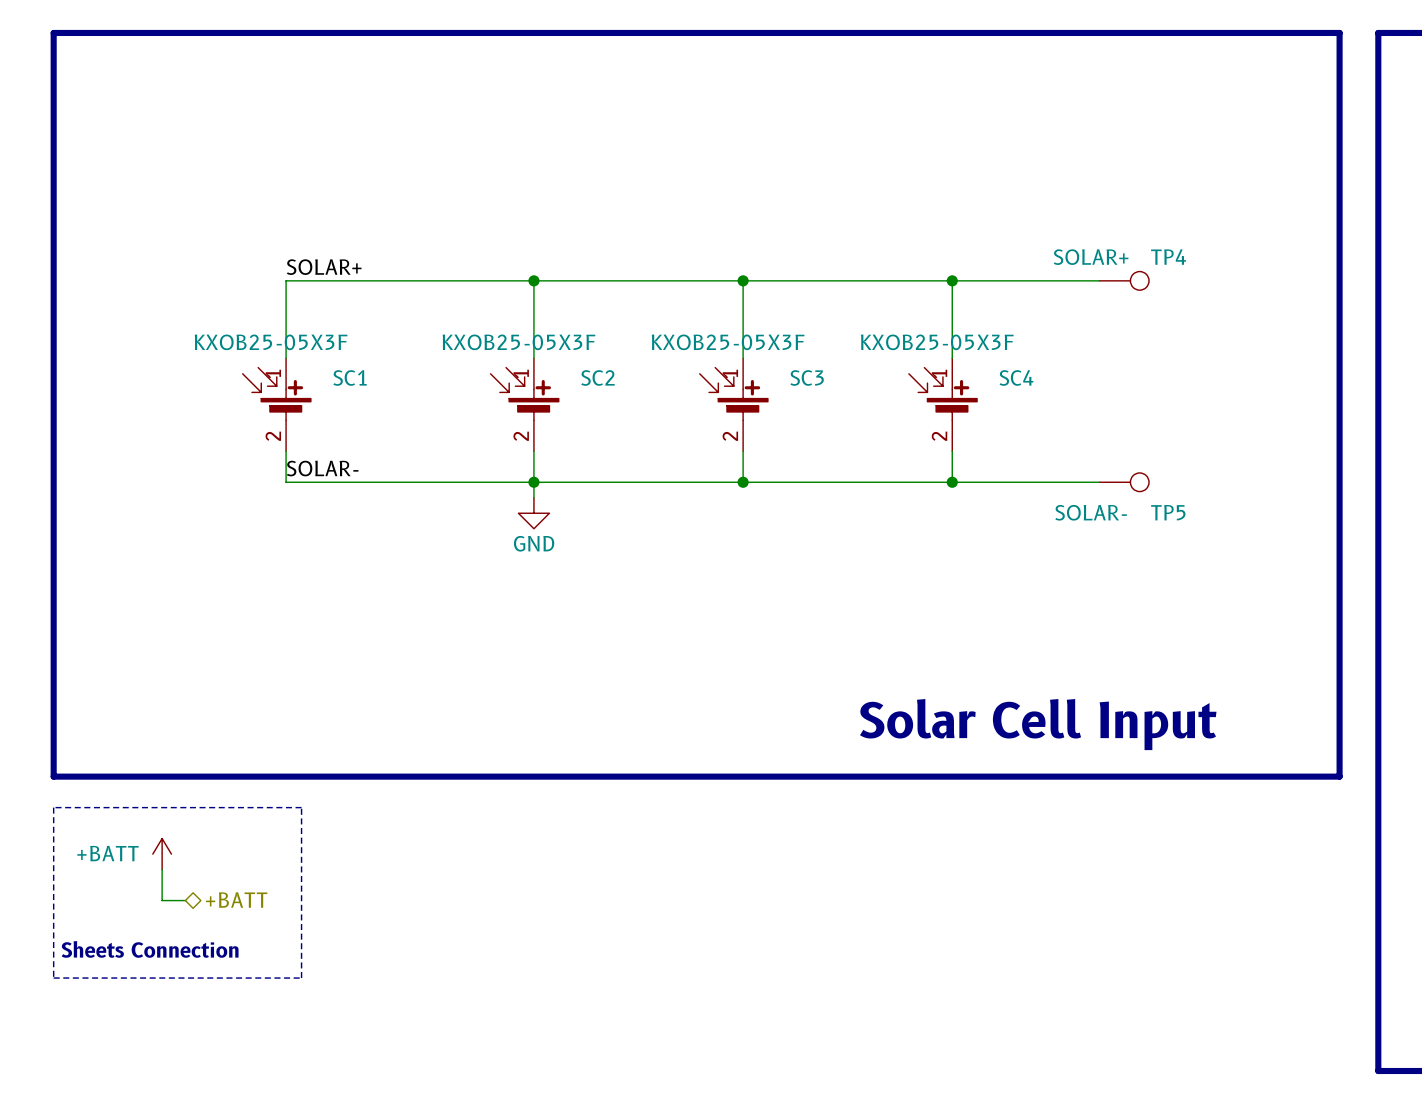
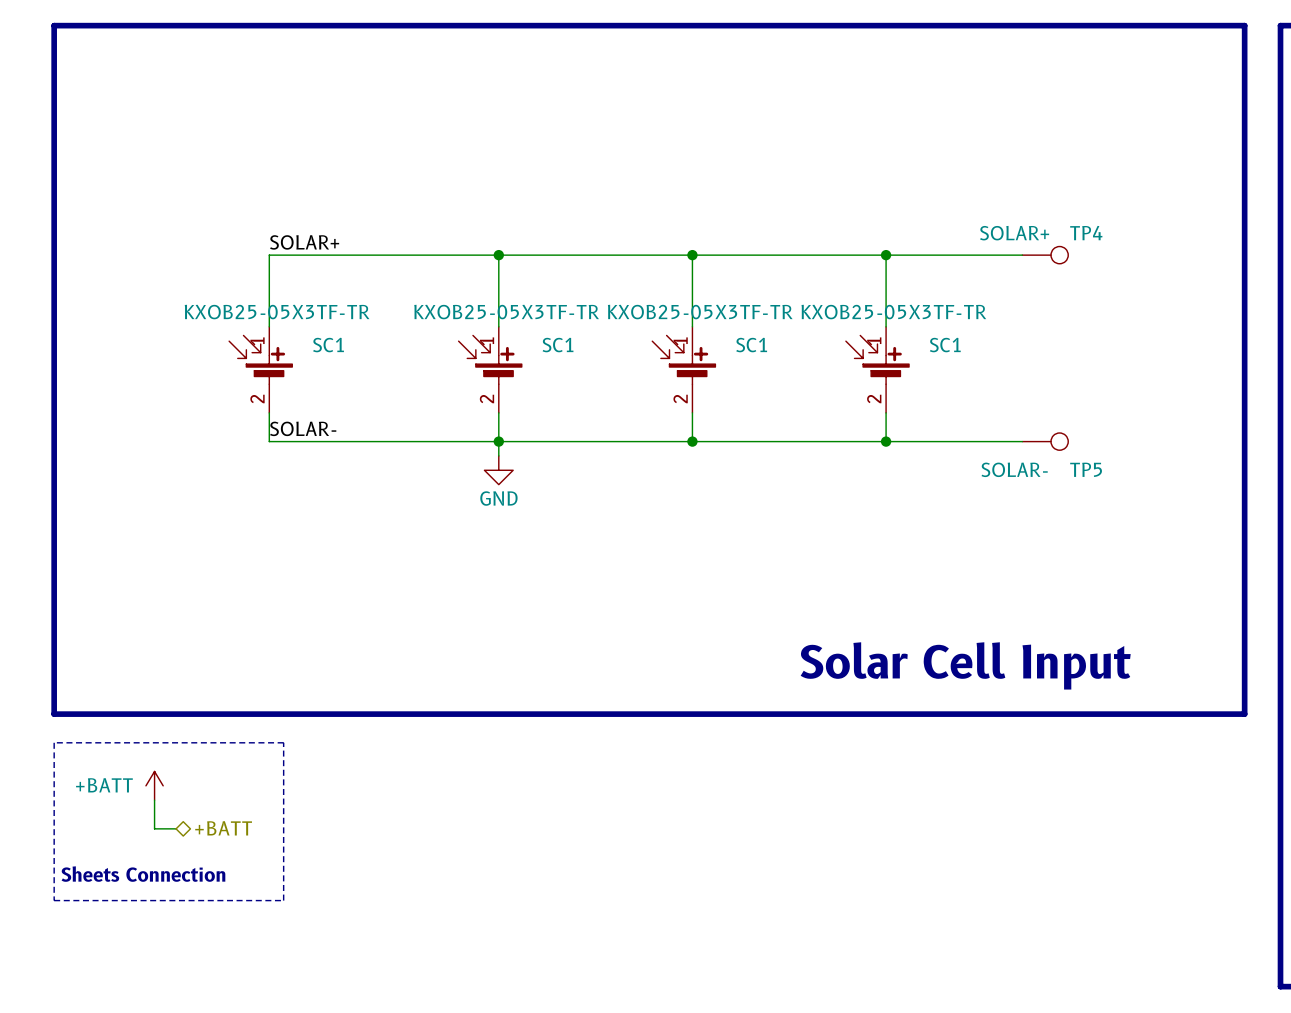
SC1 value: KXOB25-05X3F (271, 342) -> KXOB25-05X3TF-TR (277, 312)
SC2 value: KXOB25-05X3F (518, 342) -> KXOB25-05X3TF-TR (506, 312)
SC3 value: KXOB25-05X3F (728, 342) -> KXOB25-05X3TF-TR (700, 312)
SC4 value: KXOB25-05X3F (937, 342) -> KXOB25-05X3TF-TR (893, 312)
SC2 name: SC2 (597, 377) -> SC1 (558, 345)
SC3 name: SC3 (807, 377) -> SC1 (751, 345)
SC4 name: SC4 (1016, 377) -> SC1 (945, 345)

